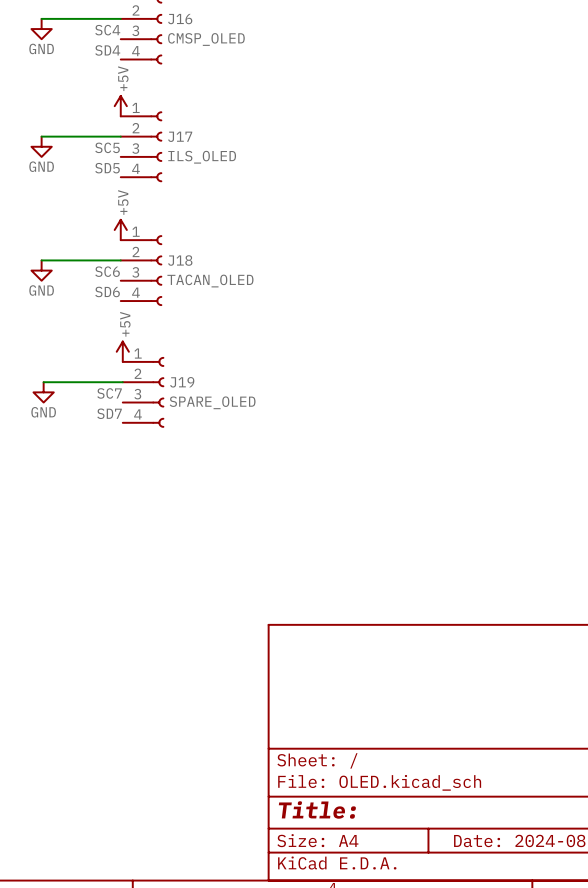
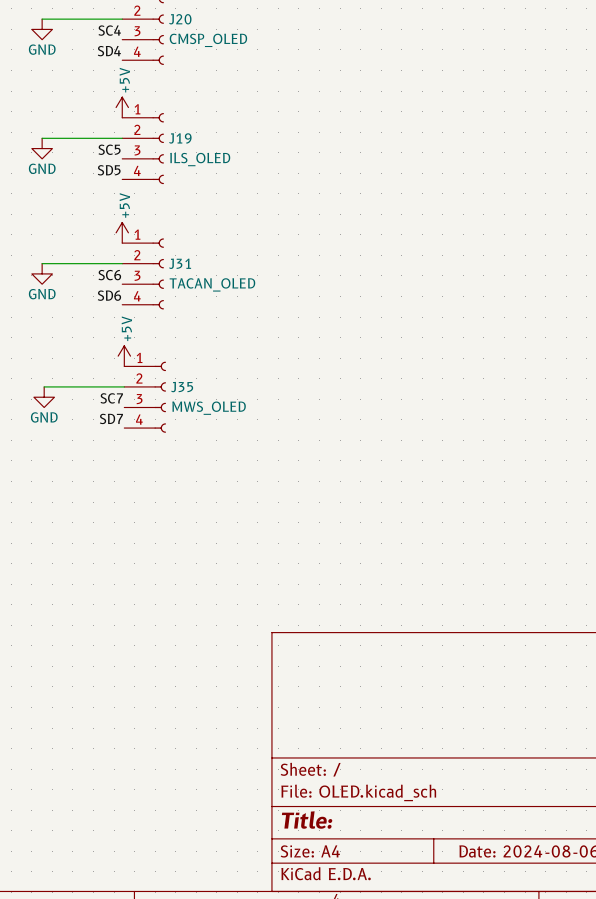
J16 name: J16 (180, 19) -> J20 (180, 19)
J17 name: J17 (180, 136) -> J19 (180, 138)
J18 name: J18 (180, 260) -> J31 (180, 263)
J19 name: J19 (182, 382) -> J35 (182, 387)
J19 value: SPARE_OLED (212, 402) -> MWS_OLED (209, 408)

